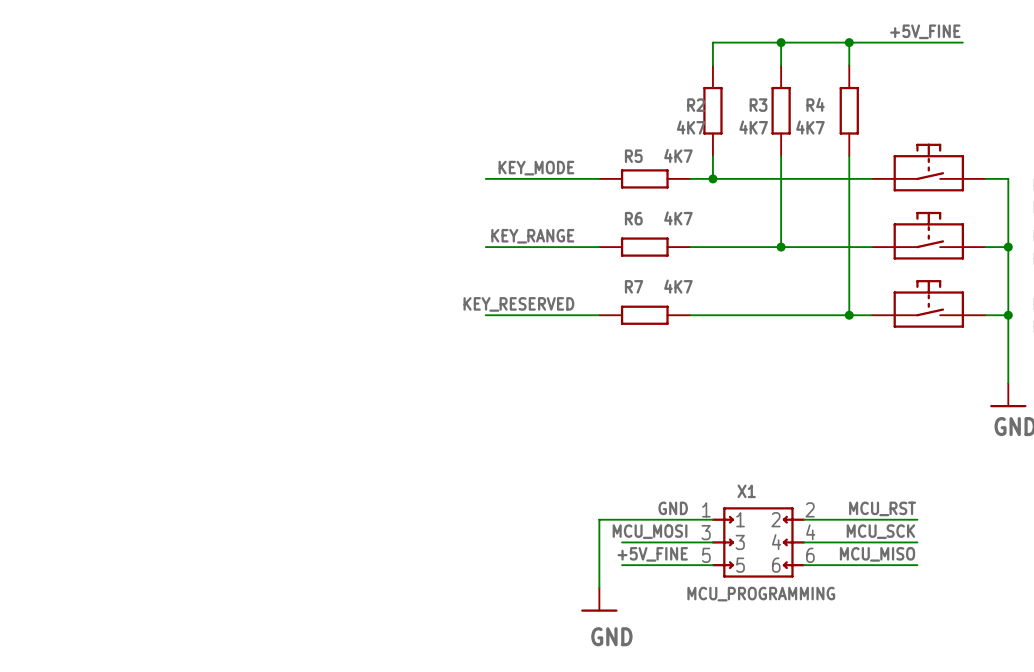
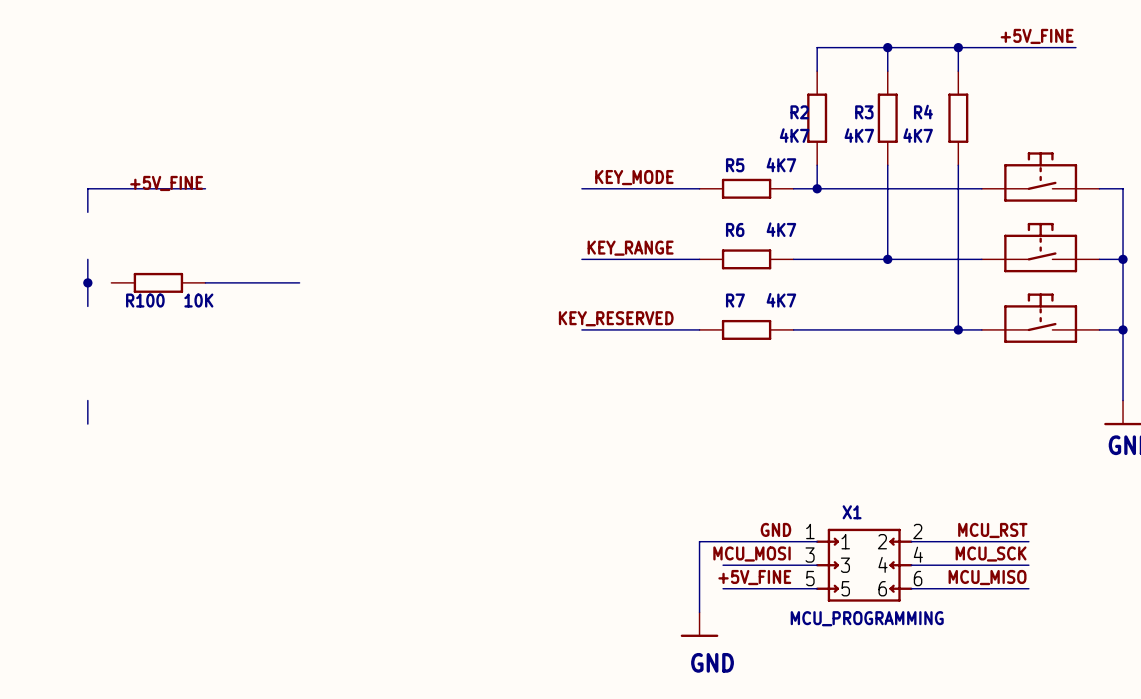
label: none -> +5V_FINE (166, 183)
wire: none -> (205, 188) (87, 188) (87, 212)
wire: none -> (87, 259) (87, 306)
junction: none -> (87, 282)
R100: none -> 10K (158, 282)
wire: none -> (205, 282) (299, 282)
wire: none -> (87, 400) (87, 424)

